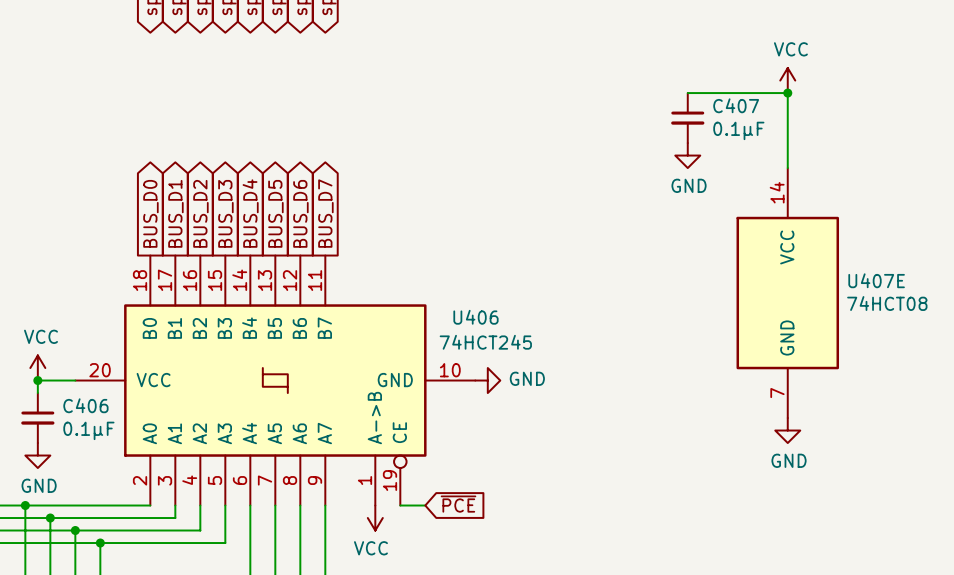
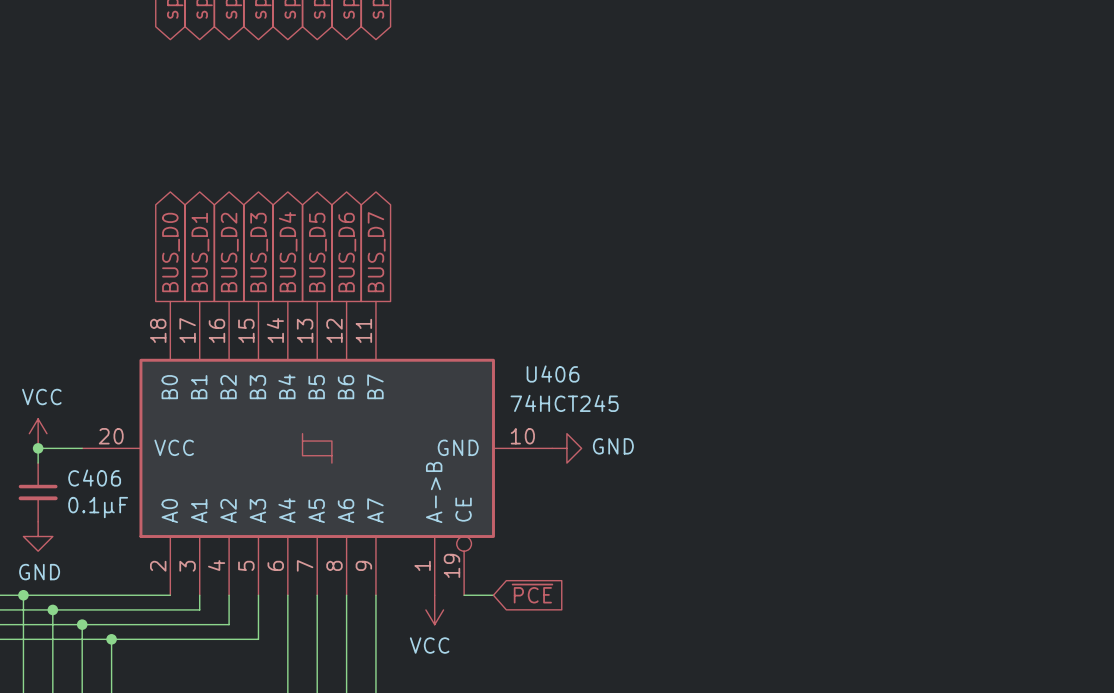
power symbol: VCC (787, 80) -> none
wire: (687, 93) (787, 93) (787, 168) -> none
junction: (787, 93) -> none
C407: 0.1µF (687, 118) -> none
power symbol: GND (687, 155) -> none
U407E: 74HCT08 (787, 293) -> none
power symbol: GND (787, 430) -> none

